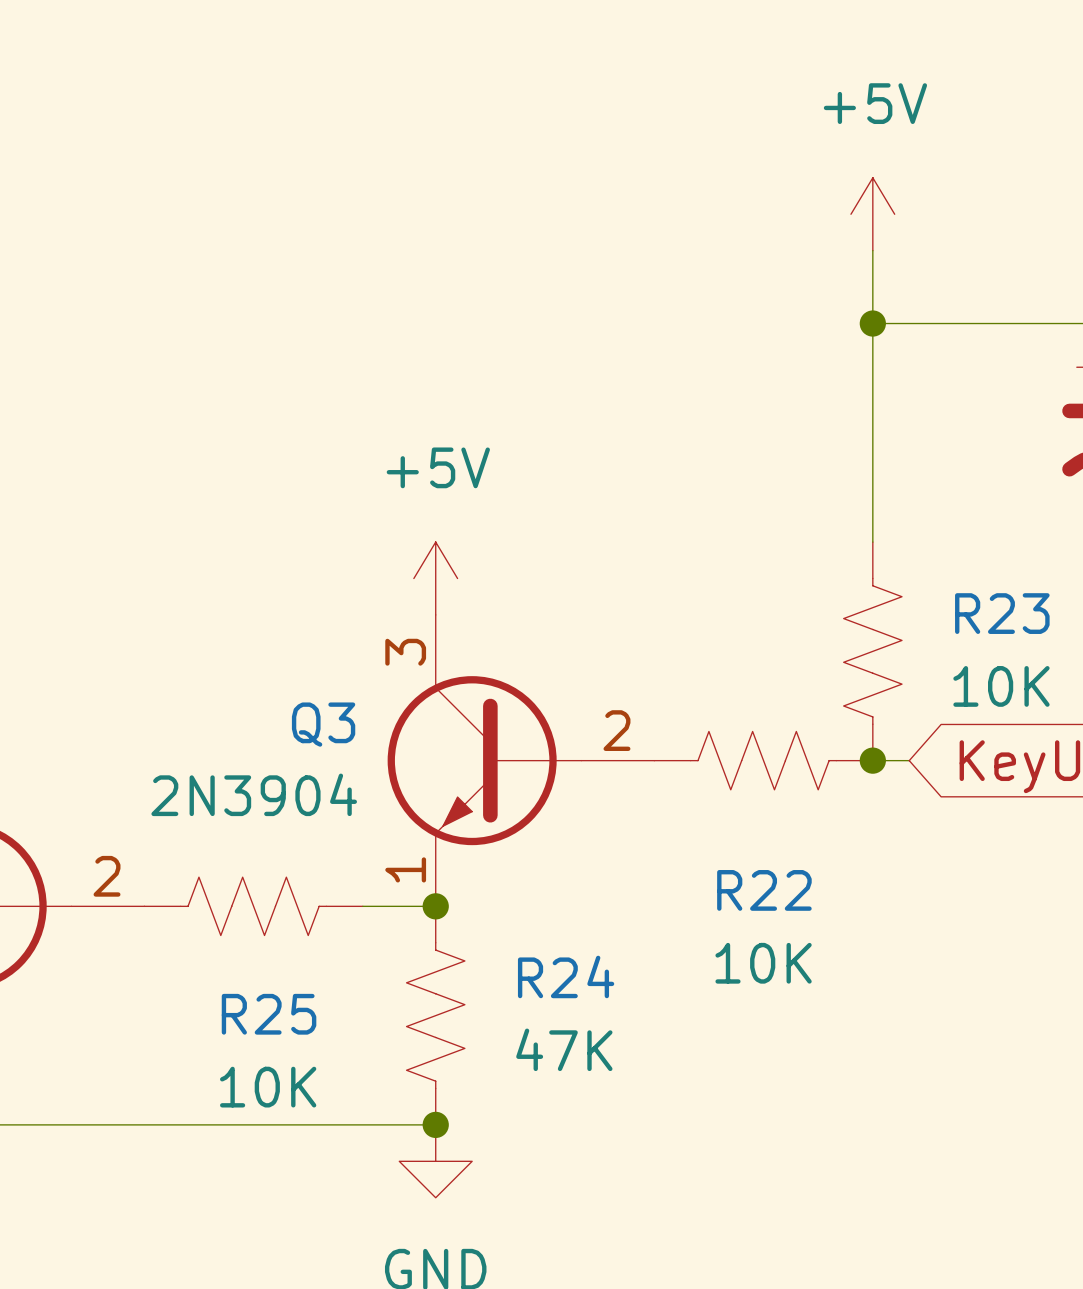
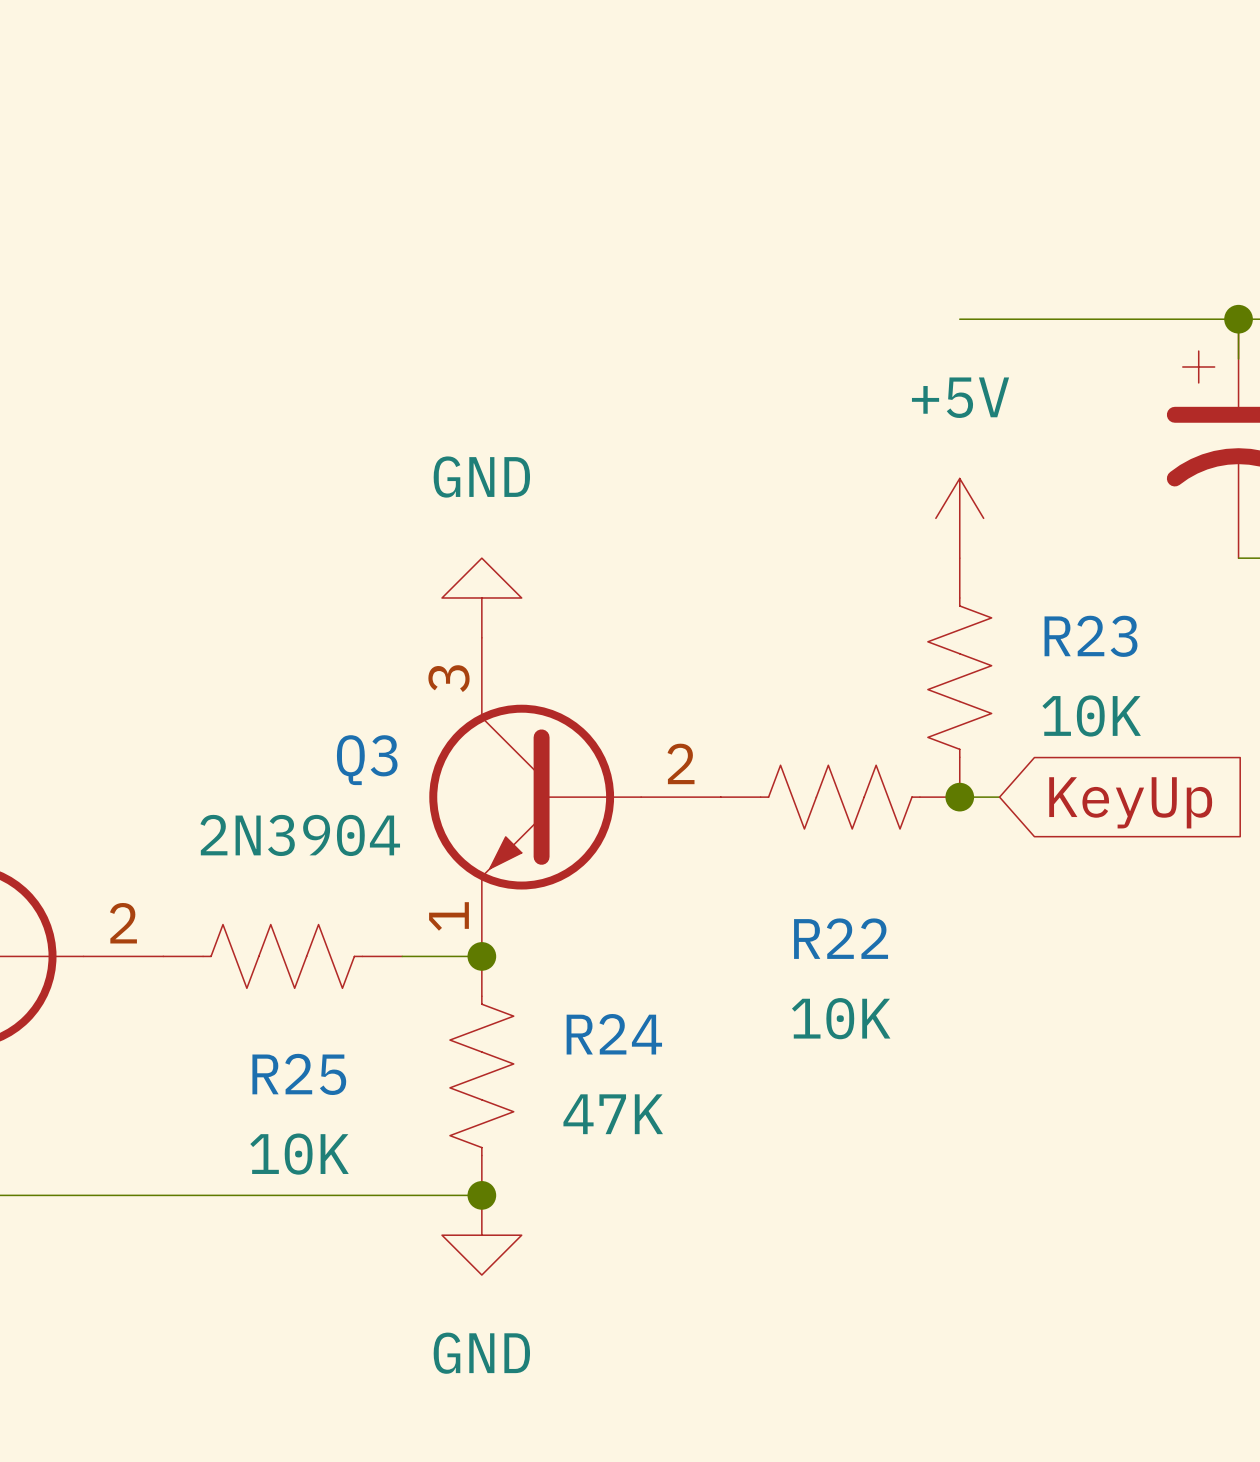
power symbol position: +5V (872, 214) -> +5V (959, 518)
wire: (872, 250) (872, 542) -> none
junction: (872, 323) -> none
power symbol: +5V (435, 578) -> GND (481, 597)

